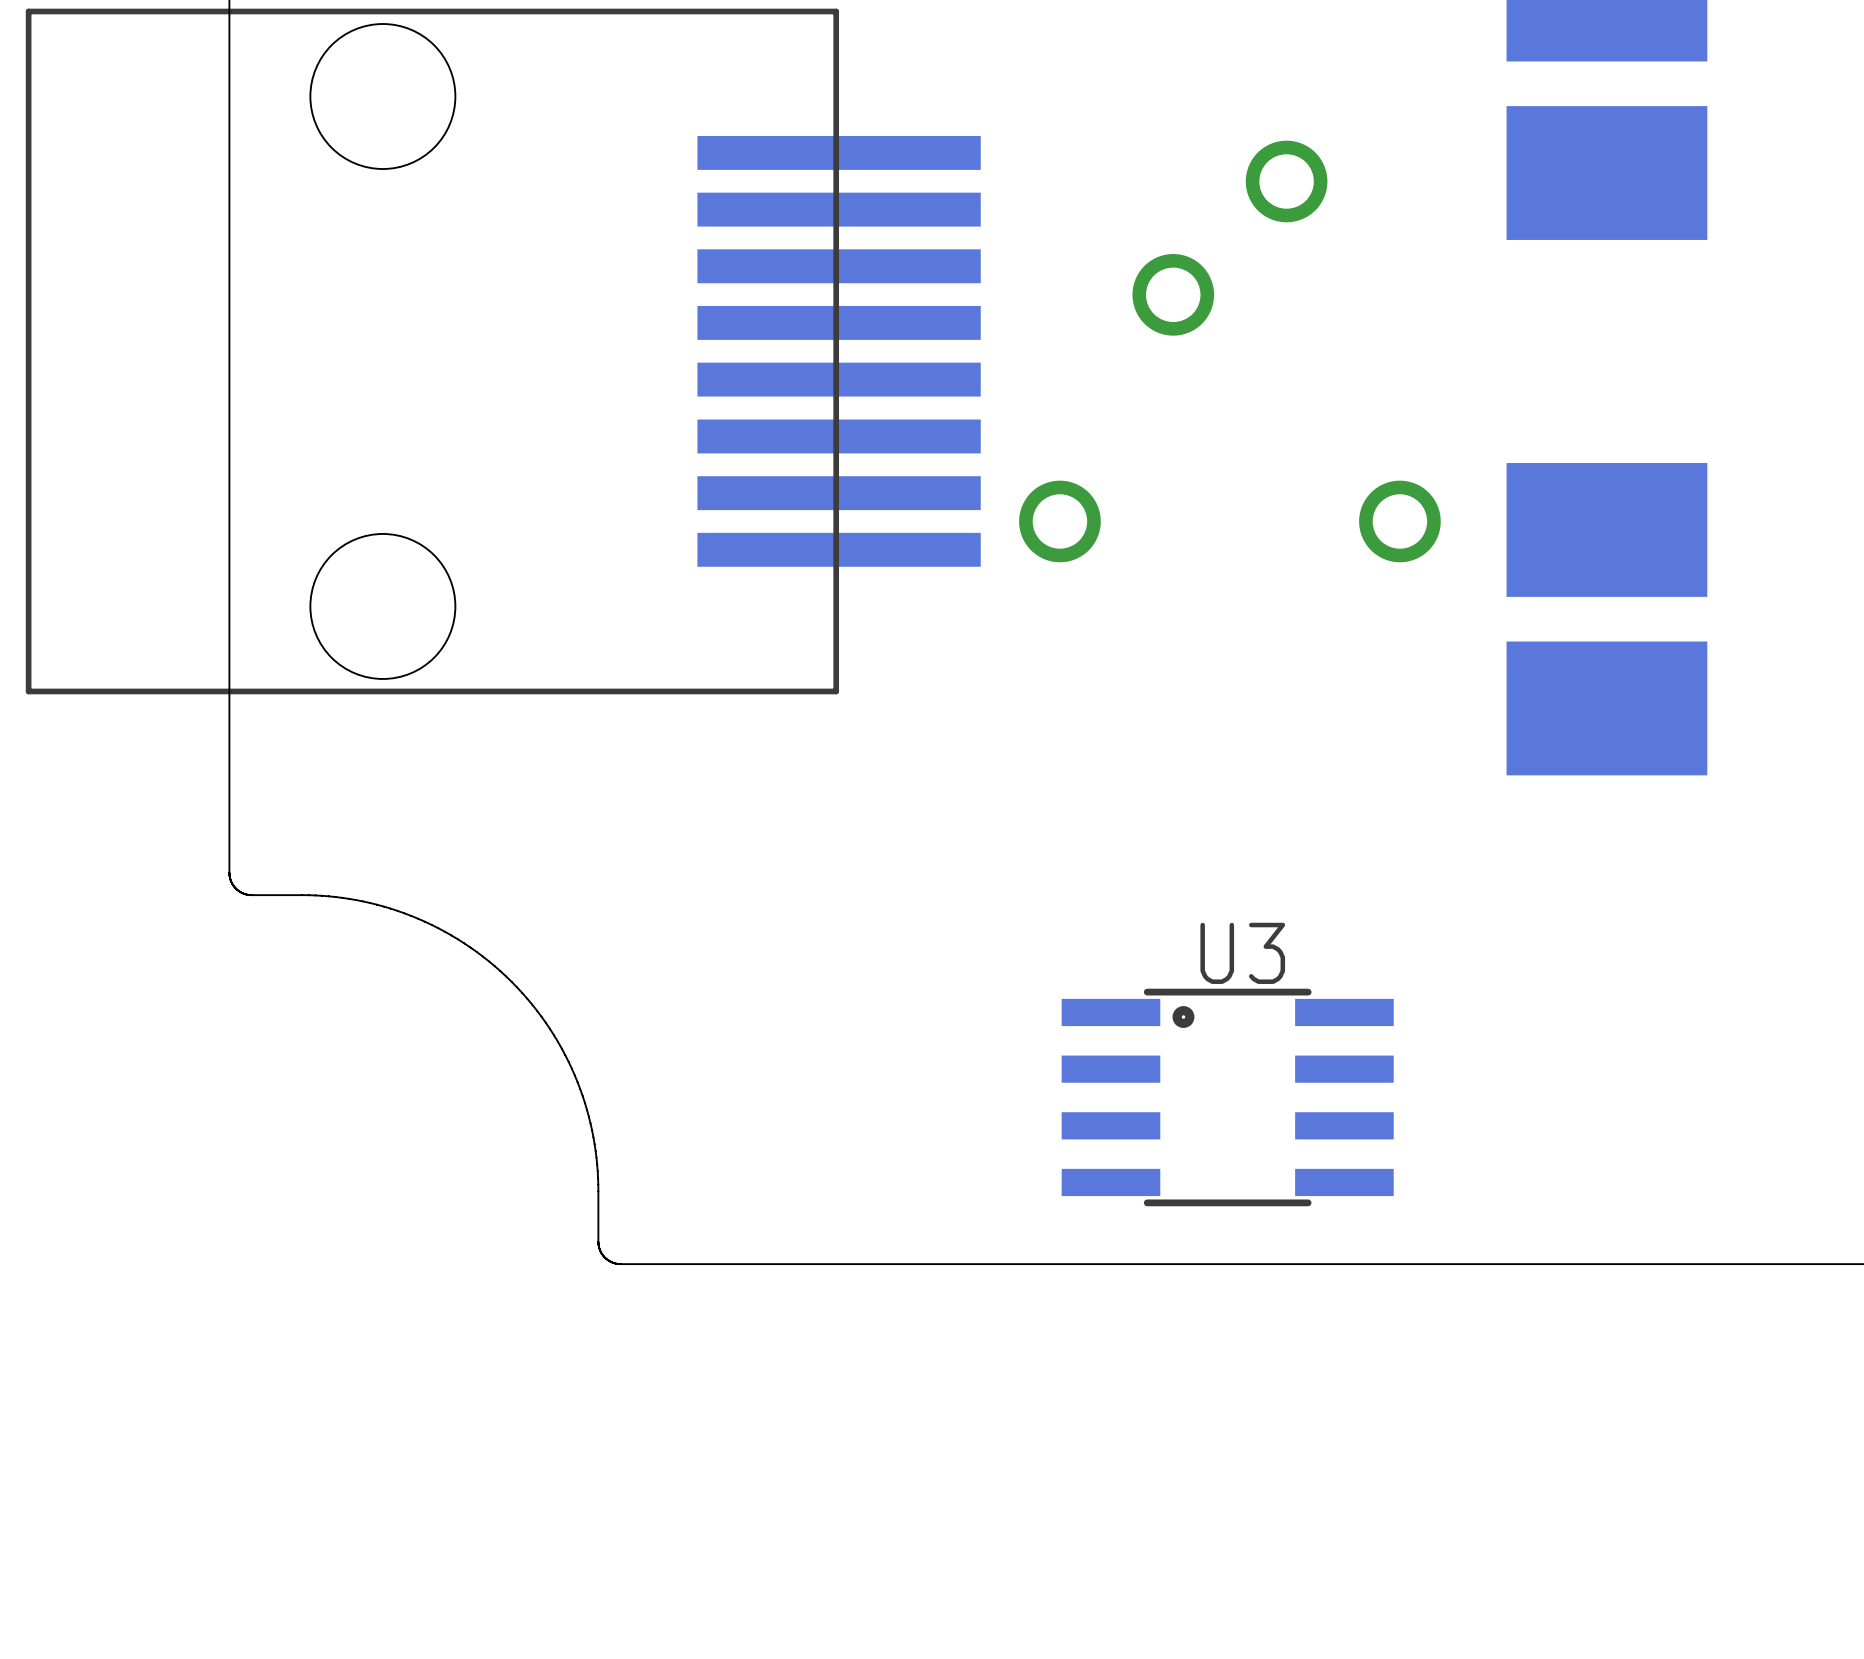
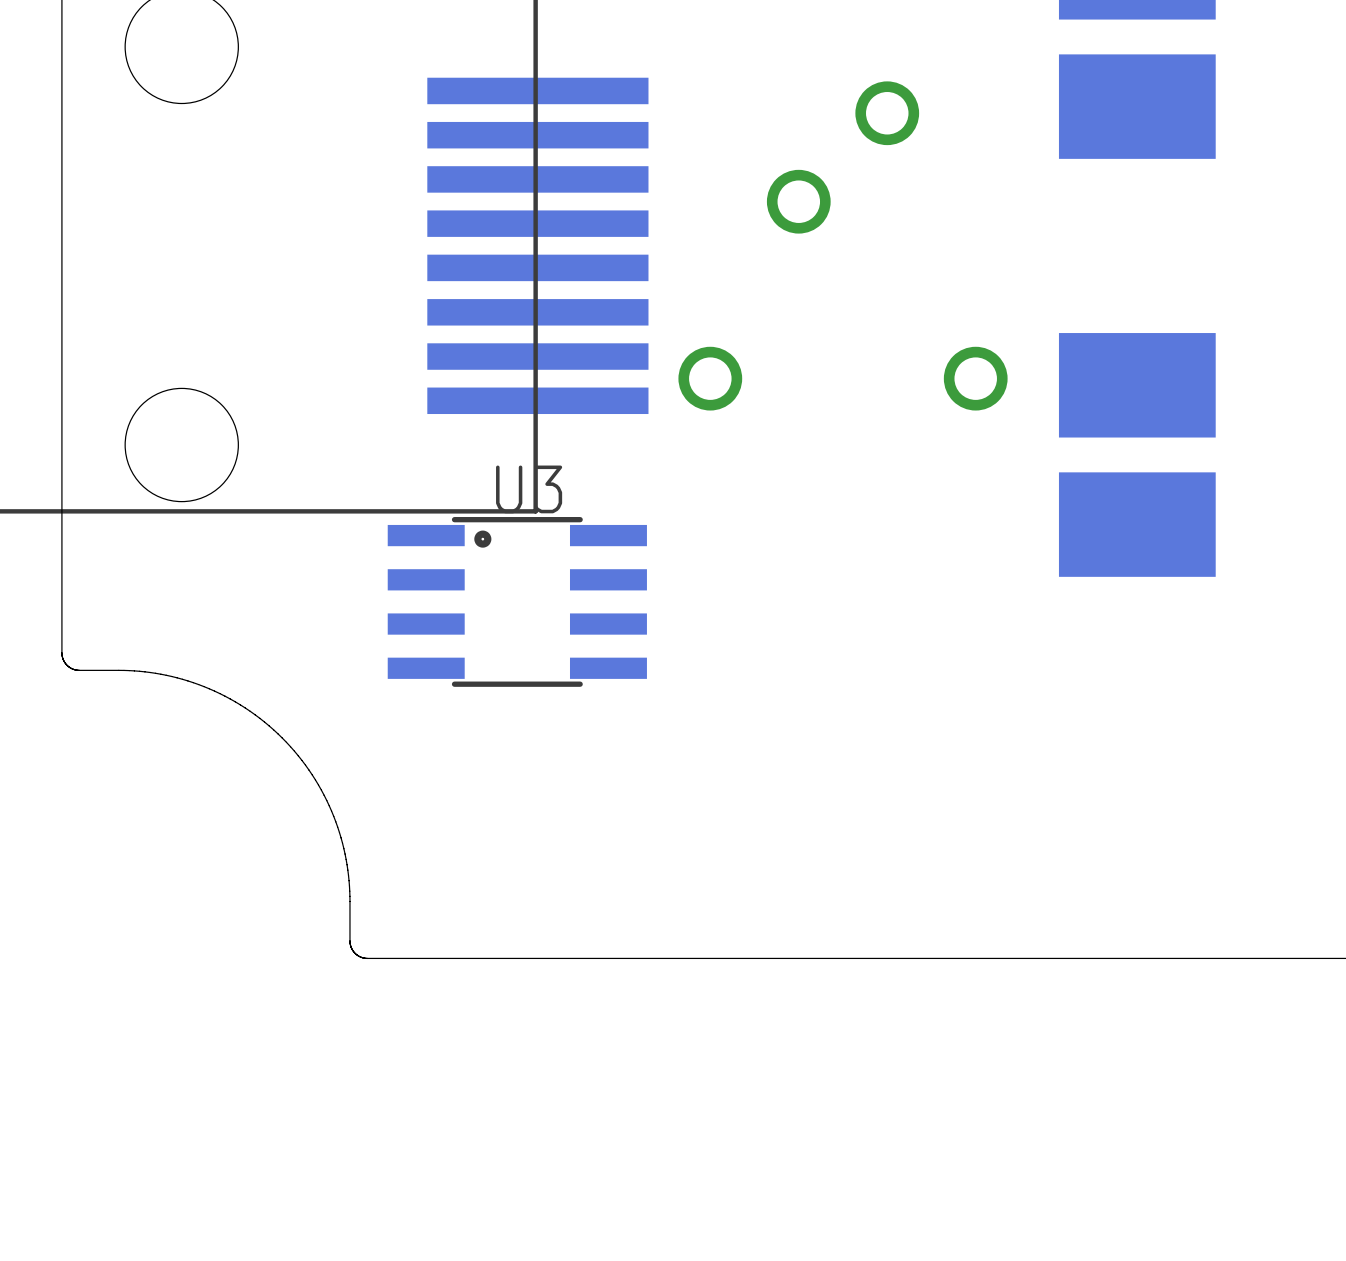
U3 position: (1227, 1097) -> (517, 601)

